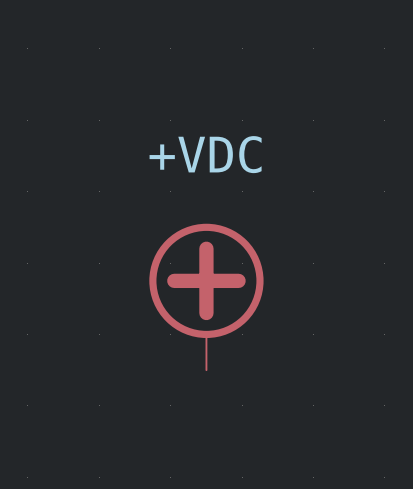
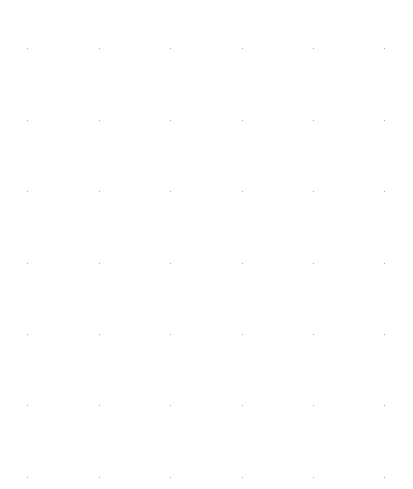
power symbol: +VDC (206, 296) -> none

